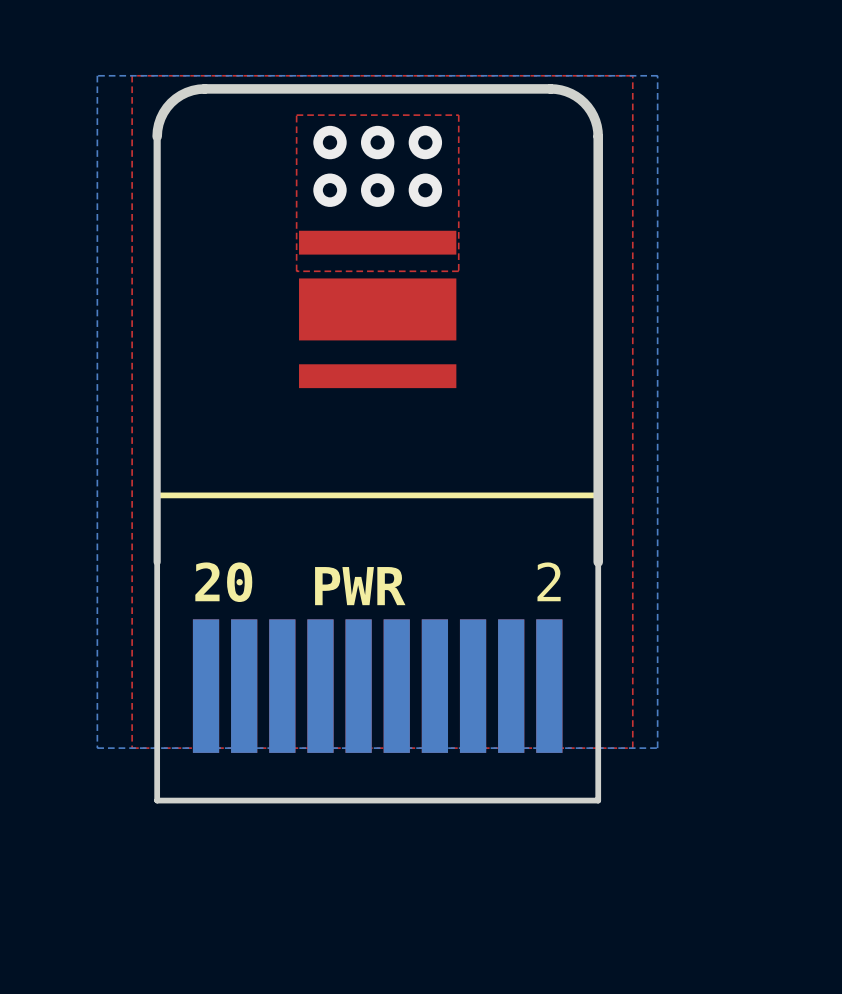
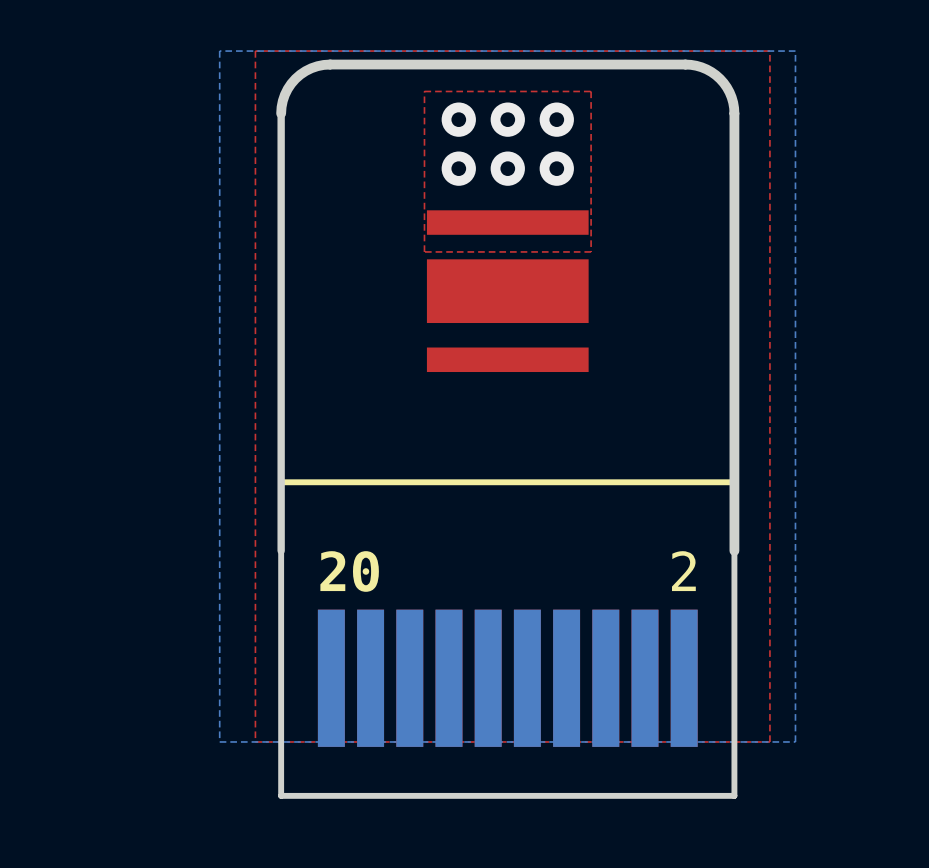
text: PWR (360, 586) -> none

